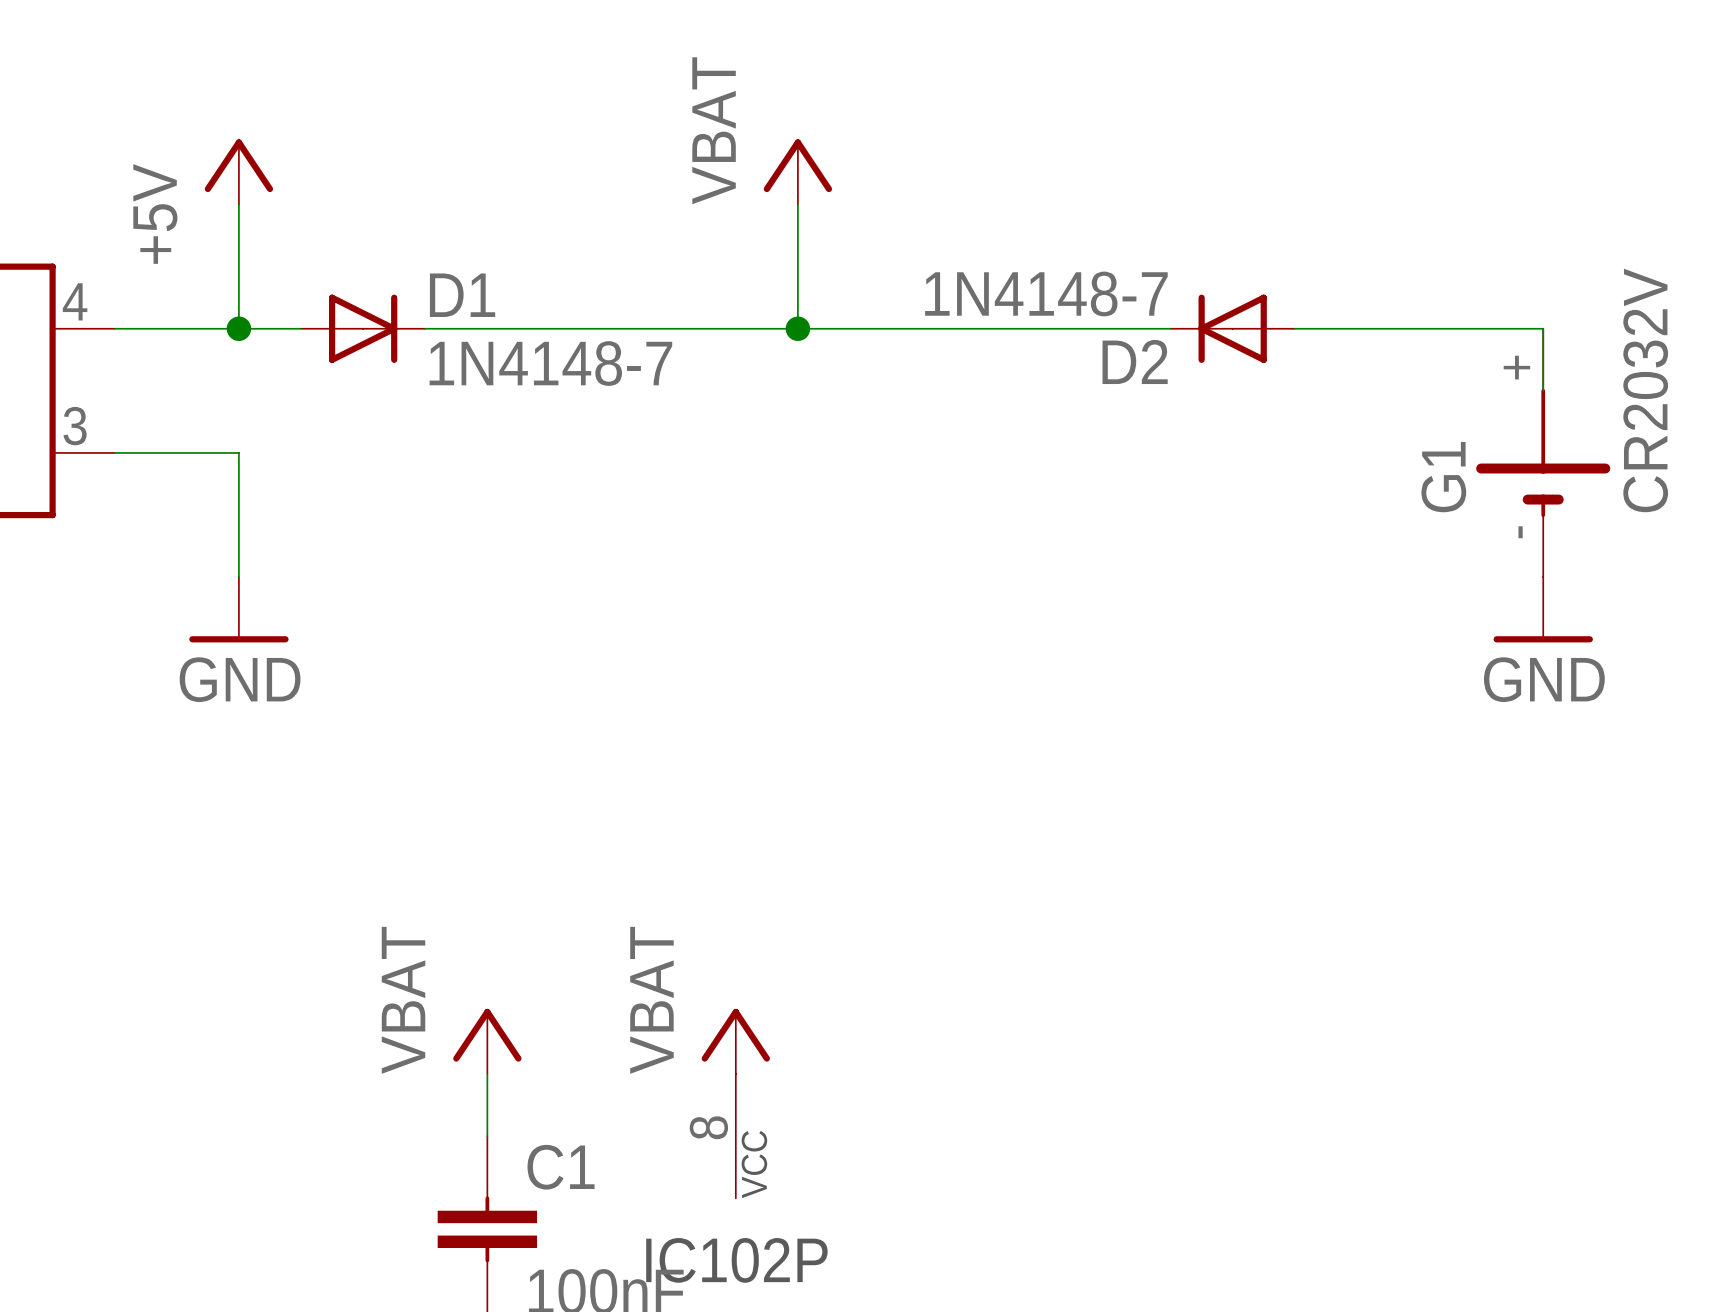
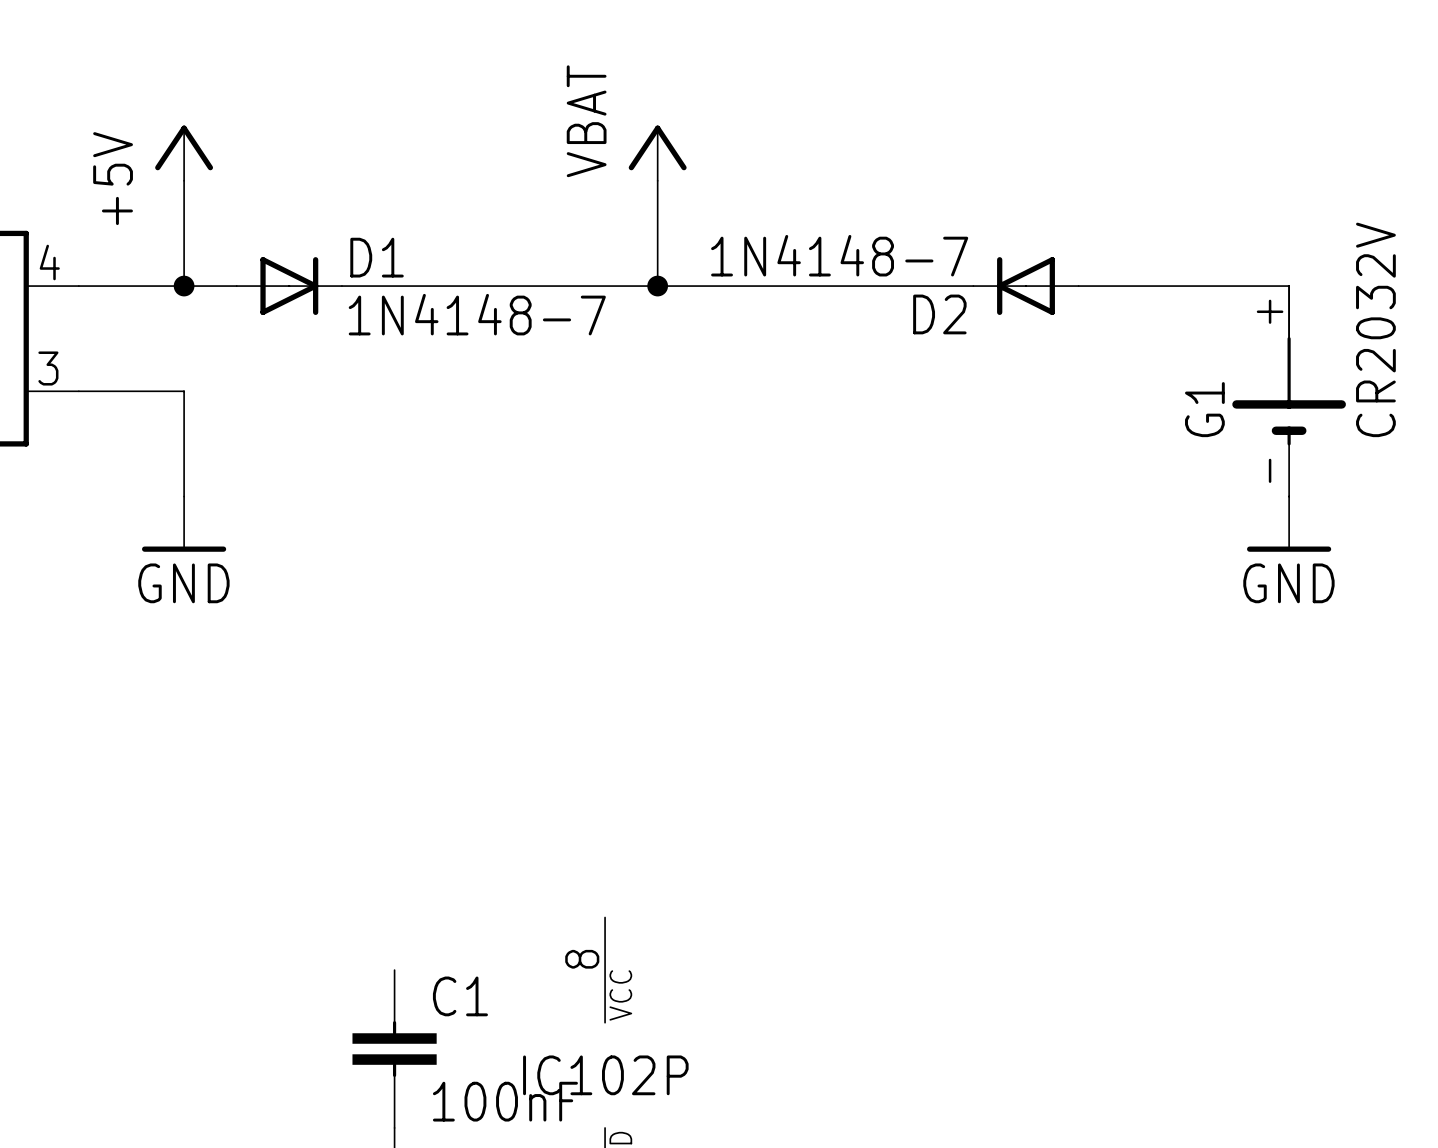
power symbol: VBAT (487, 1041) -> none
power symbol: VBAT (735, 1041) -> none
wire: (487, 1074) (487, 1136) -> none

